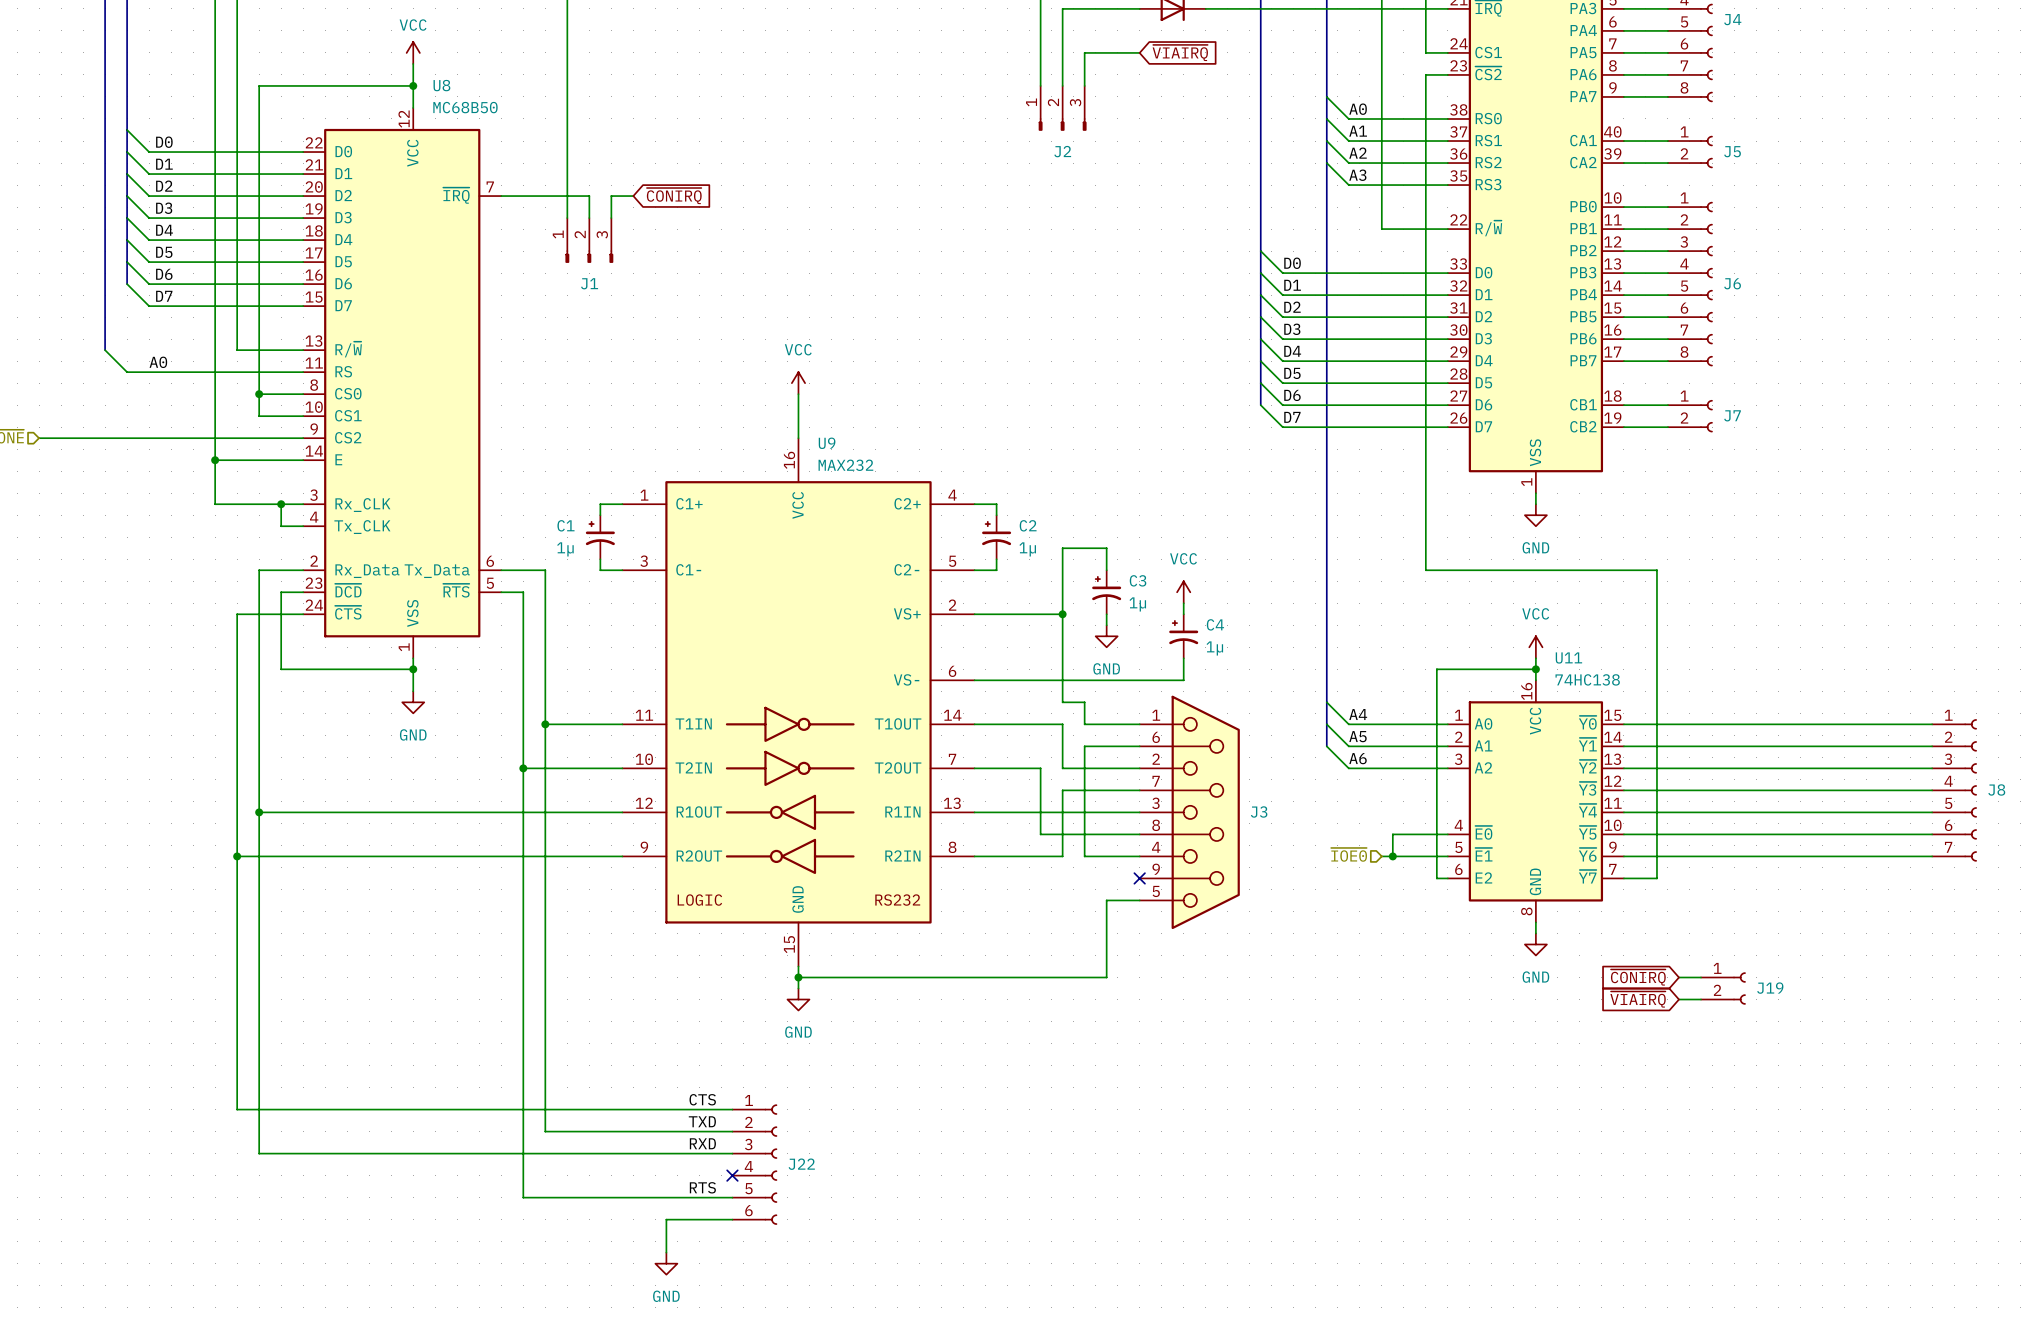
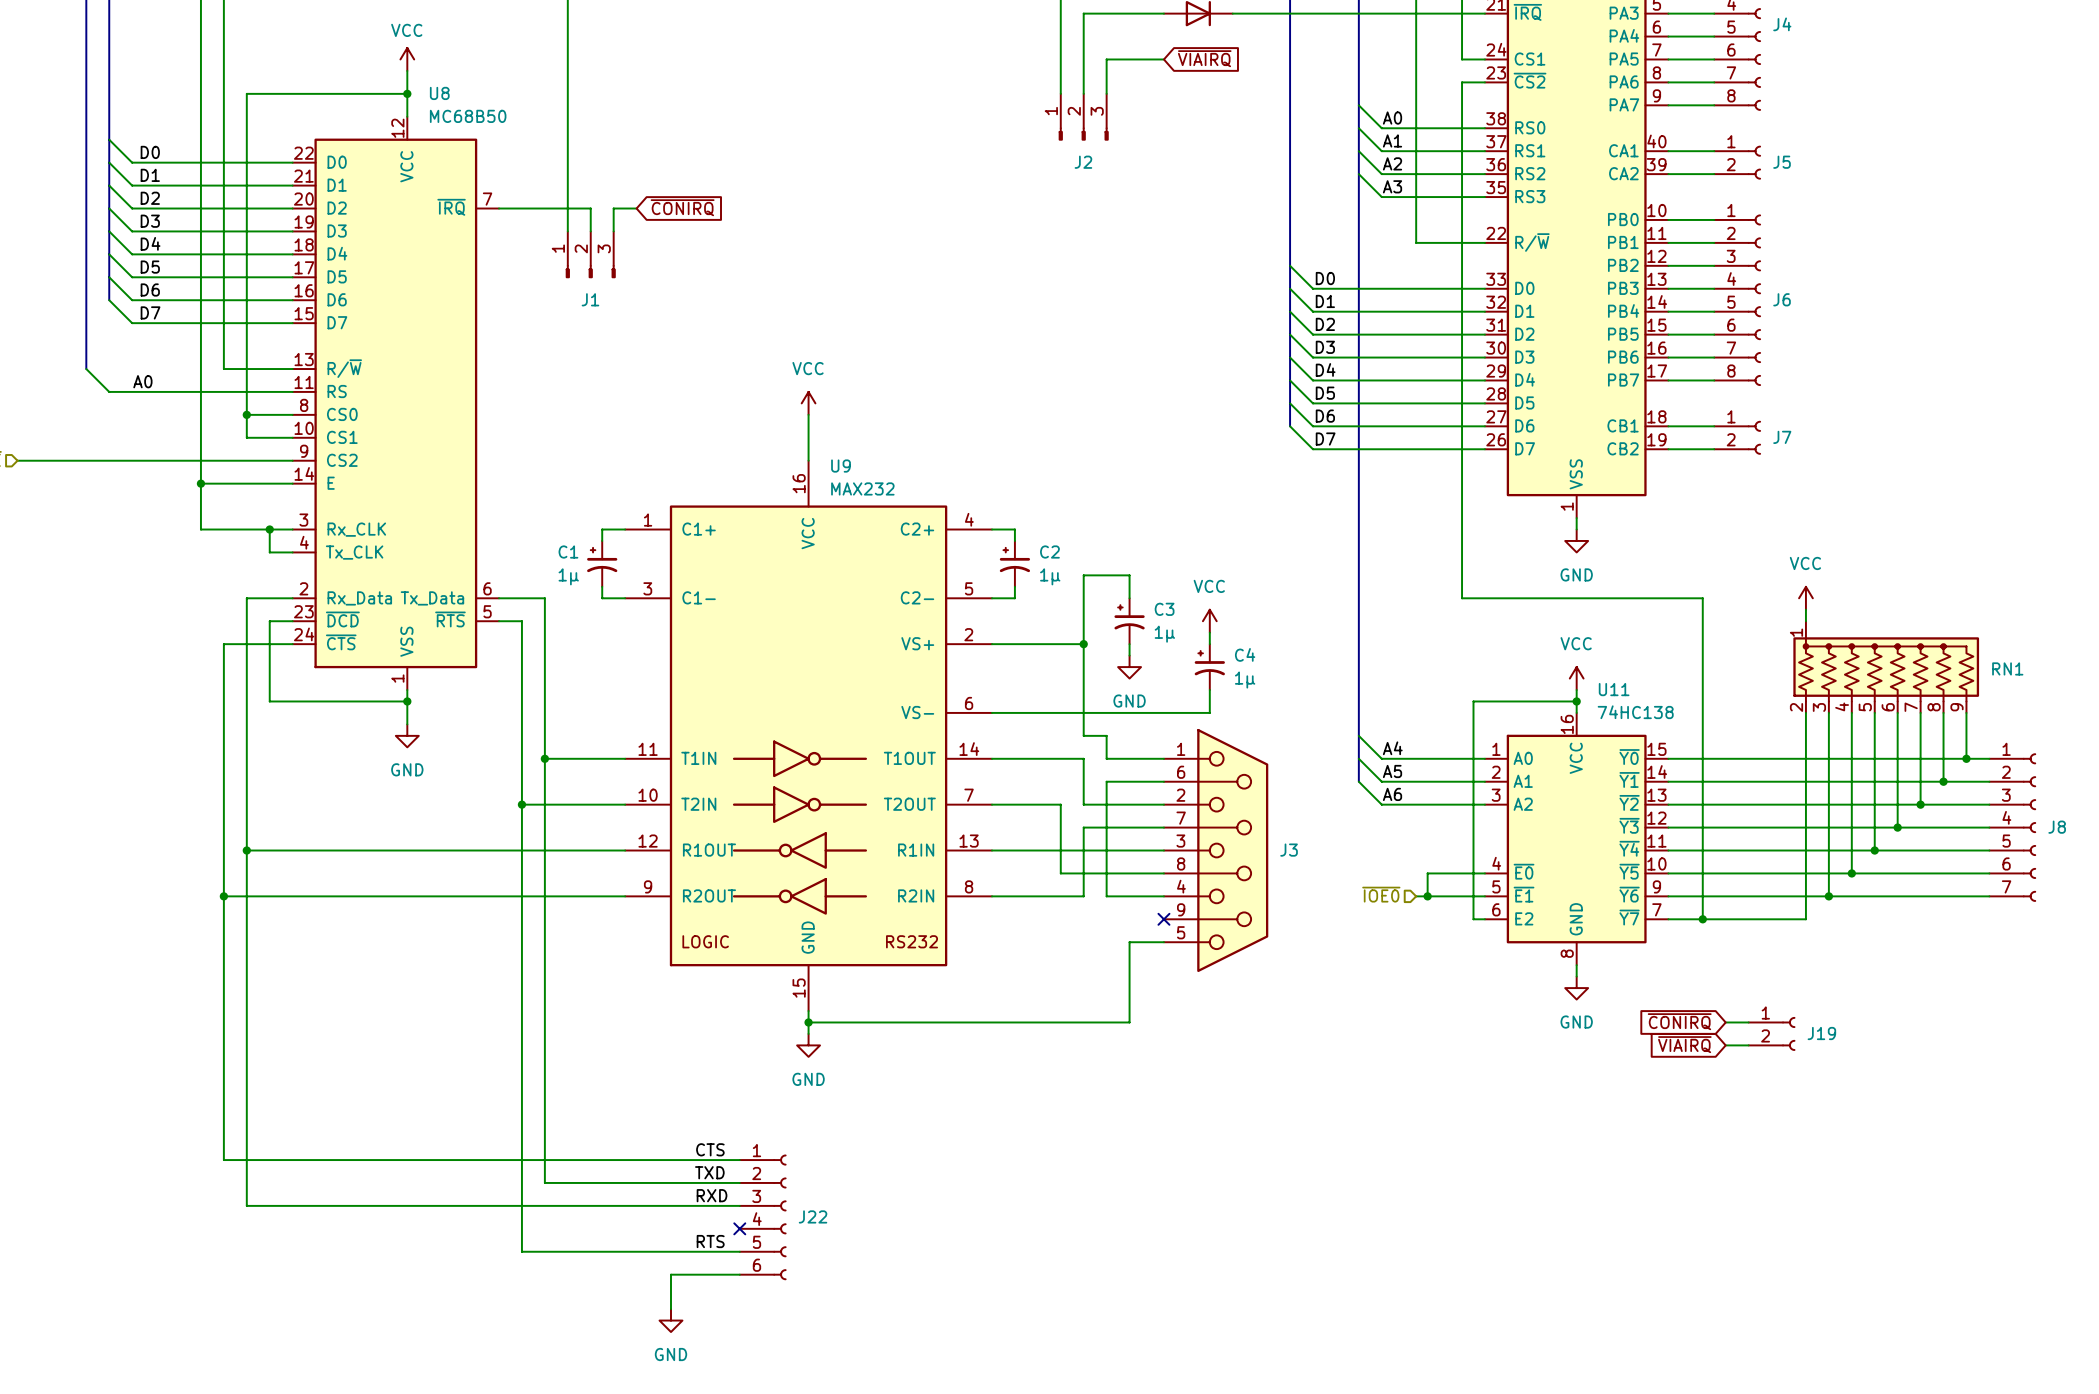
power symbol: none -> VCC (1805, 598)
wire: none -> (1805, 609) (1805, 621)
RN1: none -> (1886, 667)
wire: none -> (1805, 712) (1805, 919) (1702, 919)
wire: none -> (1828, 712) (1828, 896)
wire: none -> (1851, 712) (1851, 873)
wire: none -> (1874, 712) (1874, 850)
wire: none -> (1897, 712) (1897, 827)
wire: none -> (1920, 712) (1920, 804)
wire: none -> (1943, 712) (1943, 781)
wire: none -> (1966, 712) (1966, 758)
junction: none -> (1966, 758)
junction: none -> (1943, 781)
junction: none -> (1920, 804)
junction: none -> (1897, 827)
junction: none -> (1874, 850)
junction: none -> (1851, 873)
junction: none -> (1828, 896)
junction: none -> (1702, 919)

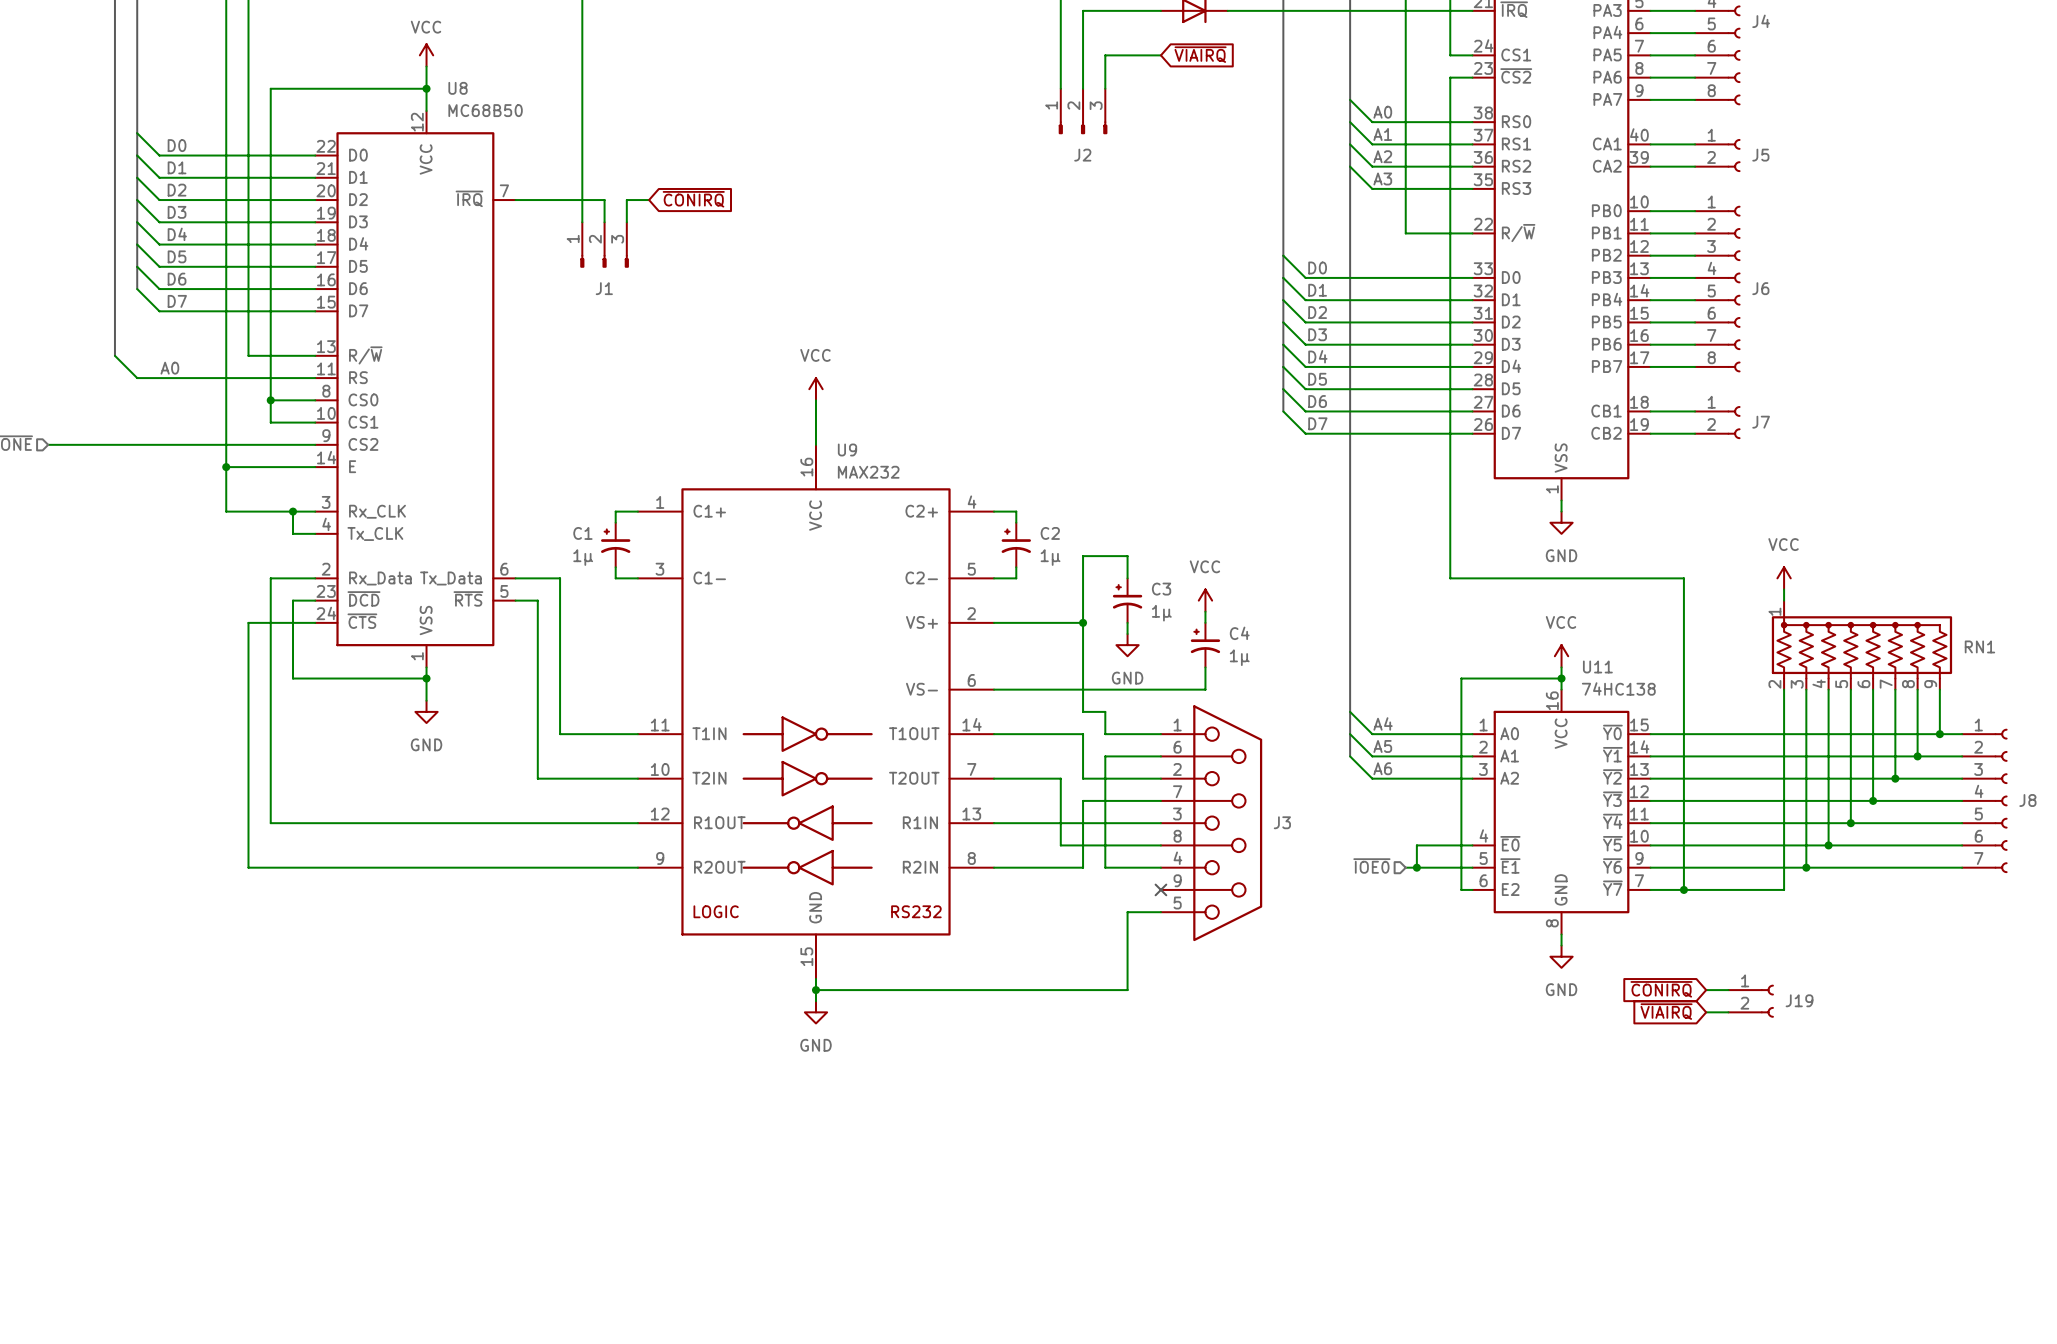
wire: (544, 758) (544, 1182) (739, 1182) -> none
junction: (544, 758) -> none
wire: (521, 804) (521, 1251) (739, 1251) -> none
junction: (521, 804) -> none
wire: (246, 850) (246, 1205) (739, 1205) -> none
junction: (246, 850) -> none
wire: (223, 896) (223, 1160) (739, 1160) -> none
junction: (223, 896) -> none
label: CTS (710, 1149) -> none
label: TXD (709, 1172) -> none
label: RXD (712, 1195) -> none
J22: (763, 1217) -> none
no-connect mark: (739, 1228) -> none
label: RTS (710, 1241) -> none
wire: (739, 1274) (670, 1274) (670, 1309) -> none
power symbol: GND (670, 1320) -> none

